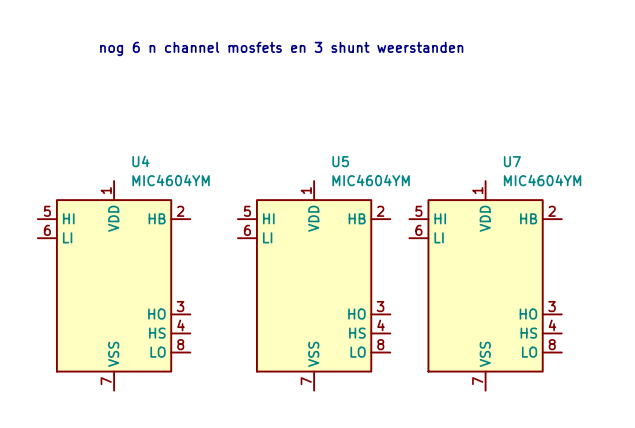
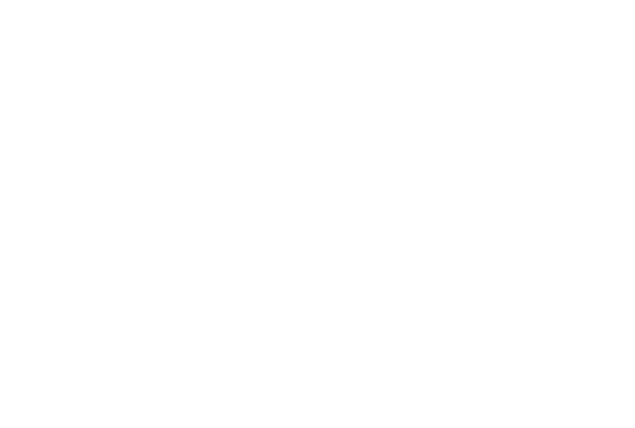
text: nog 6 n channel mosfets en 3 shunt weerstanden (281, 48) -> none
U4: MIC4604YM (114, 285) -> none
U5: MIC4604YM (314, 285) -> none
U7: MIC4604YM (485, 285) -> none

